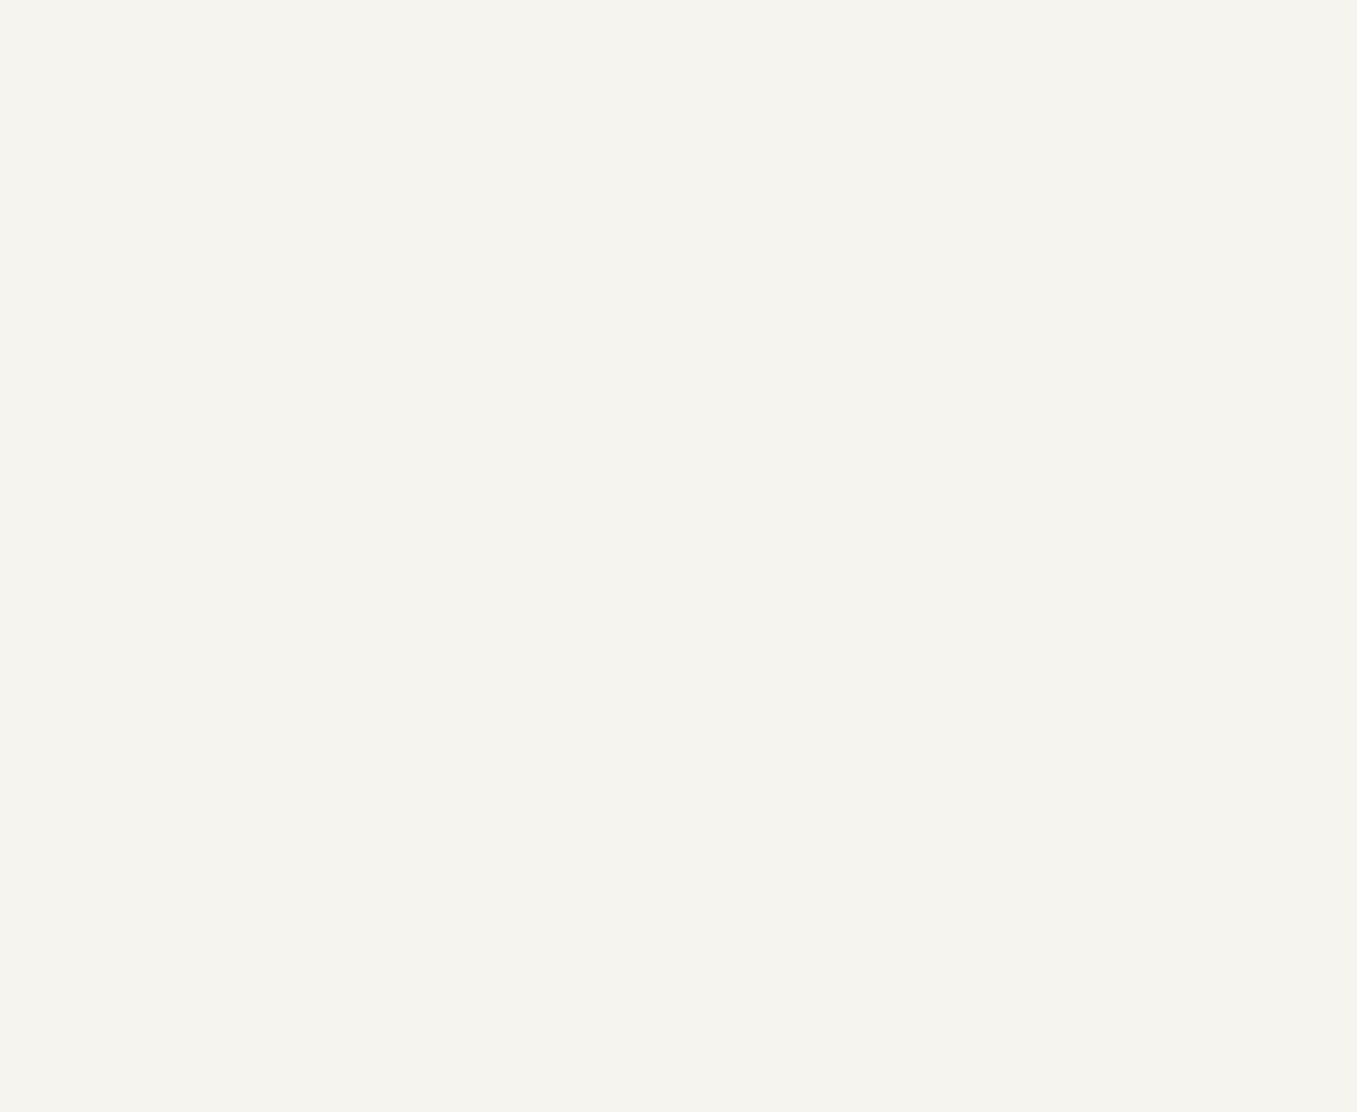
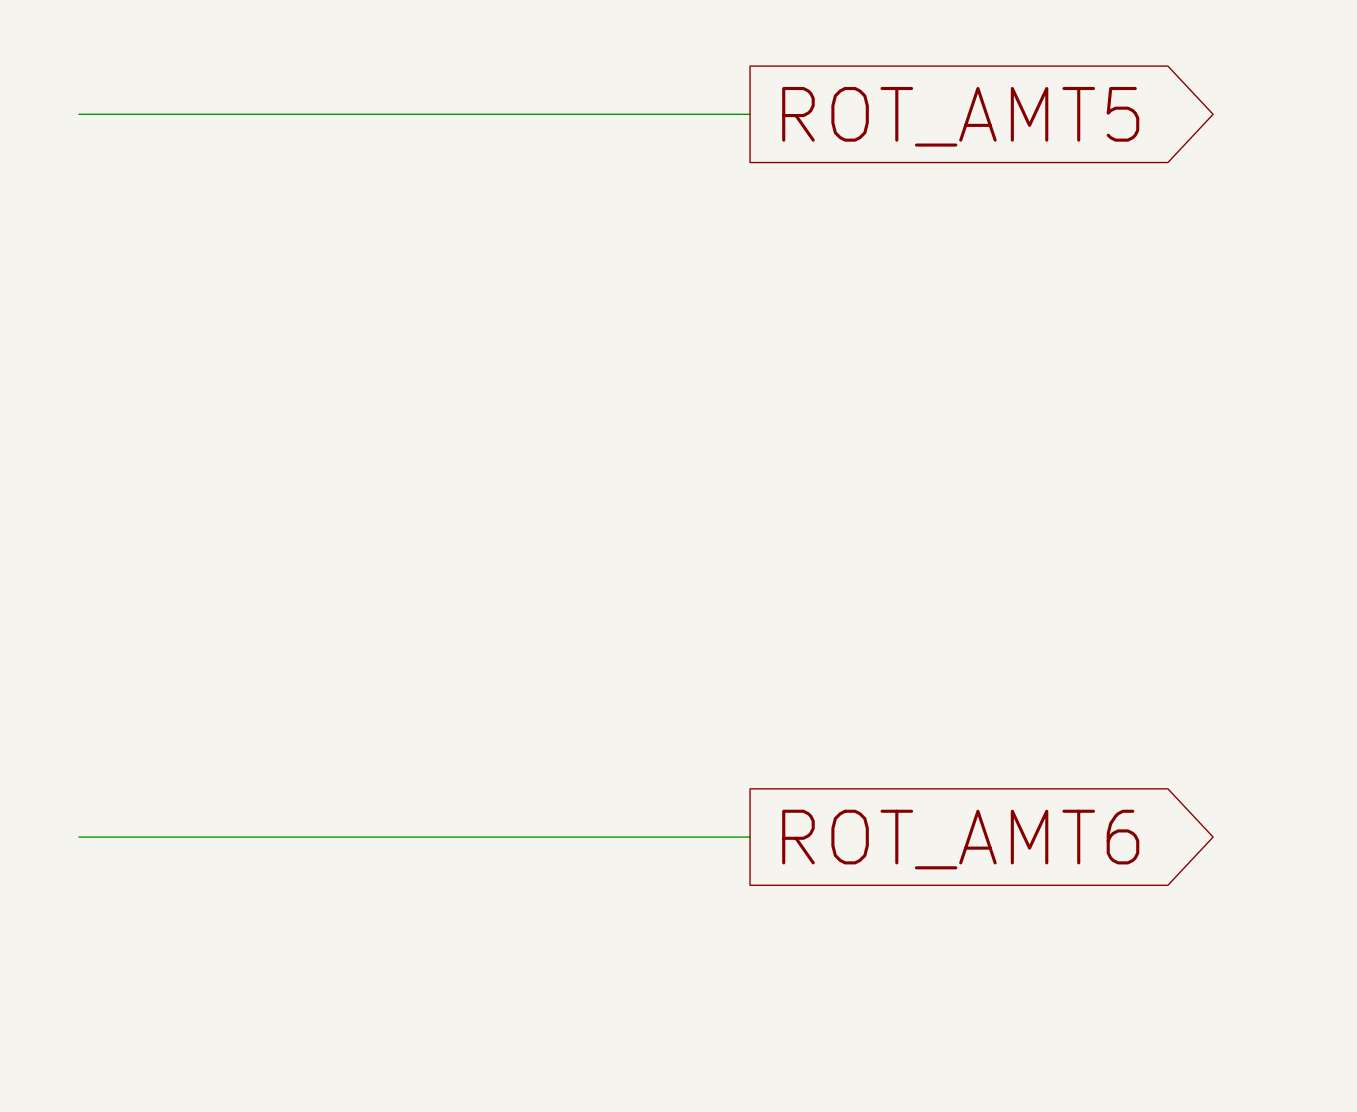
wire: none -> (78, 114) (750, 114)
global label: none -> ROT_AMT5 (960, 116)
wire: none -> (78, 837) (750, 837)
global label: none -> ROT_AMT6 (960, 839)

